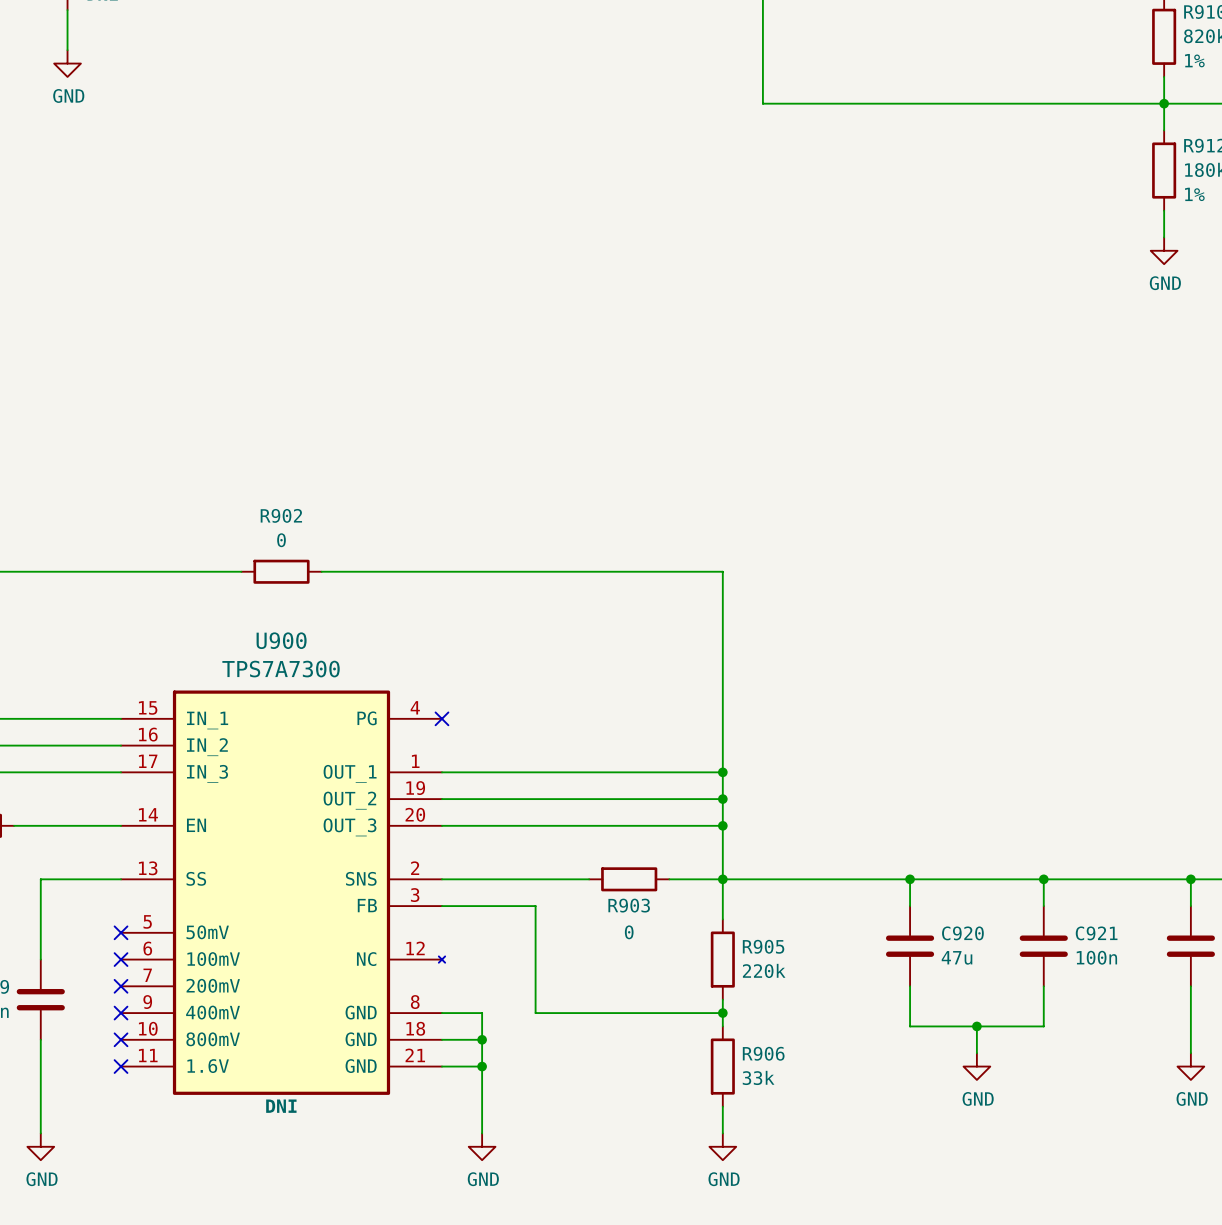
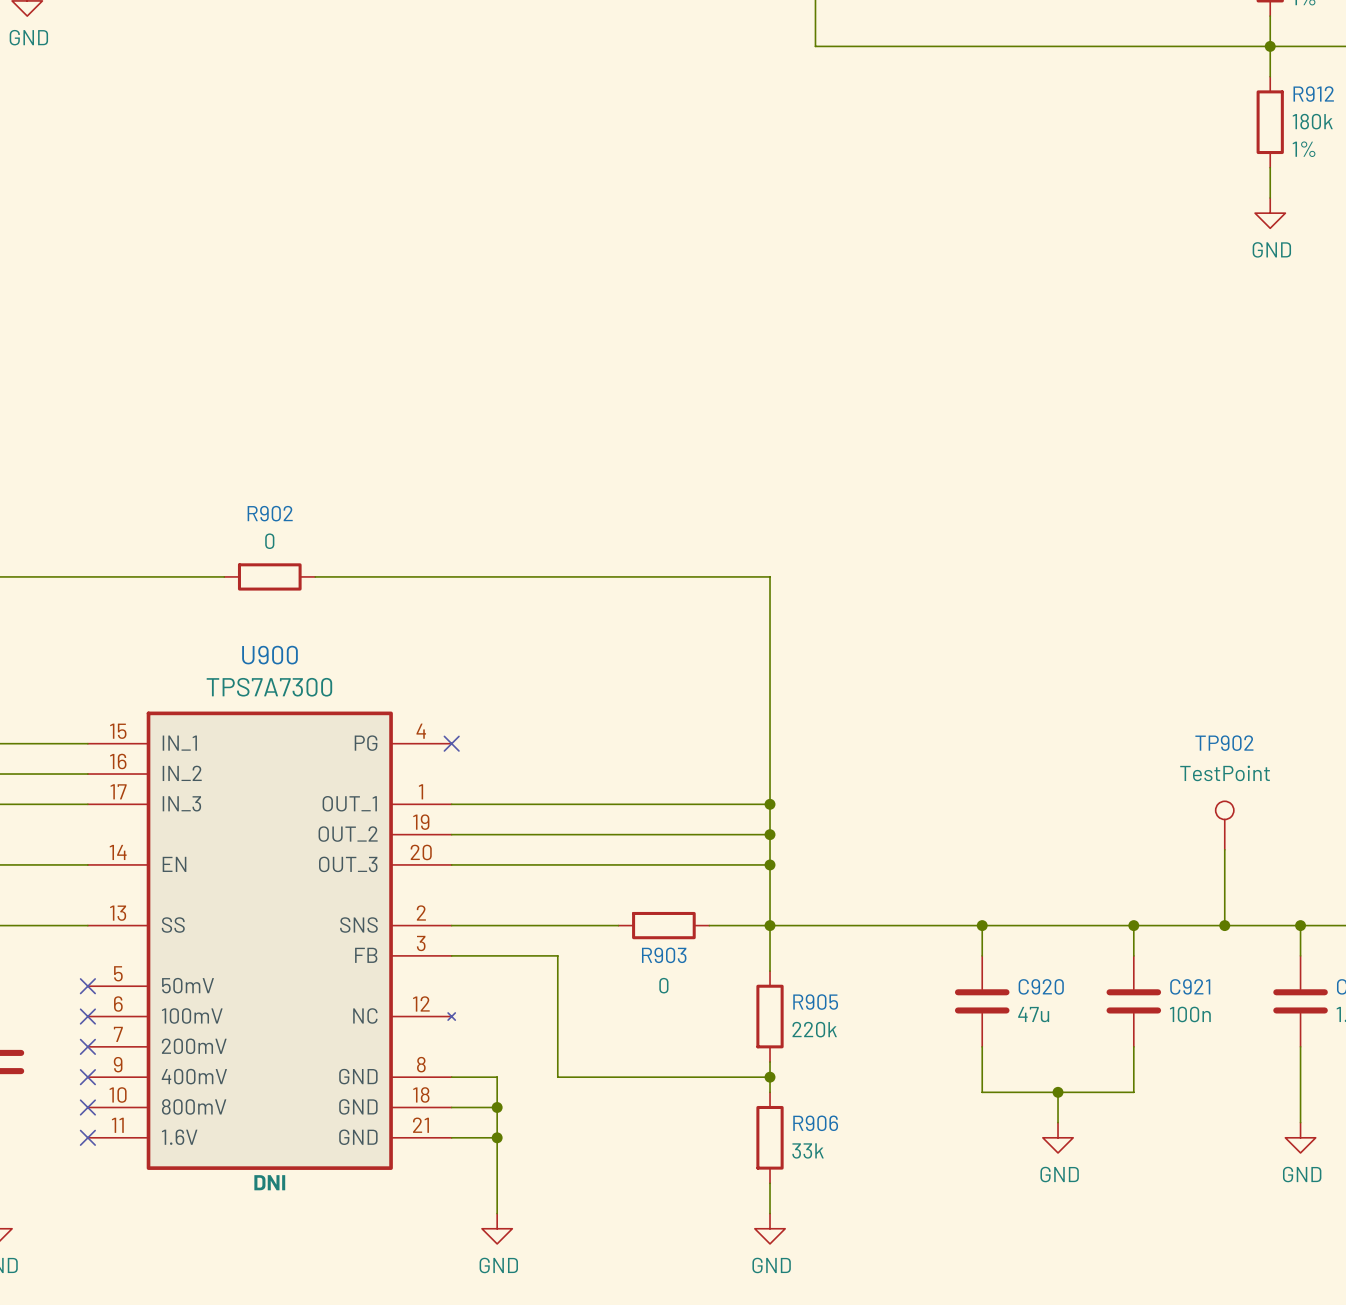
TP902: none -> TestPoint (1224, 825)
wire: none -> (1224, 849) (1224, 925)
junction: none -> (1224, 925)

